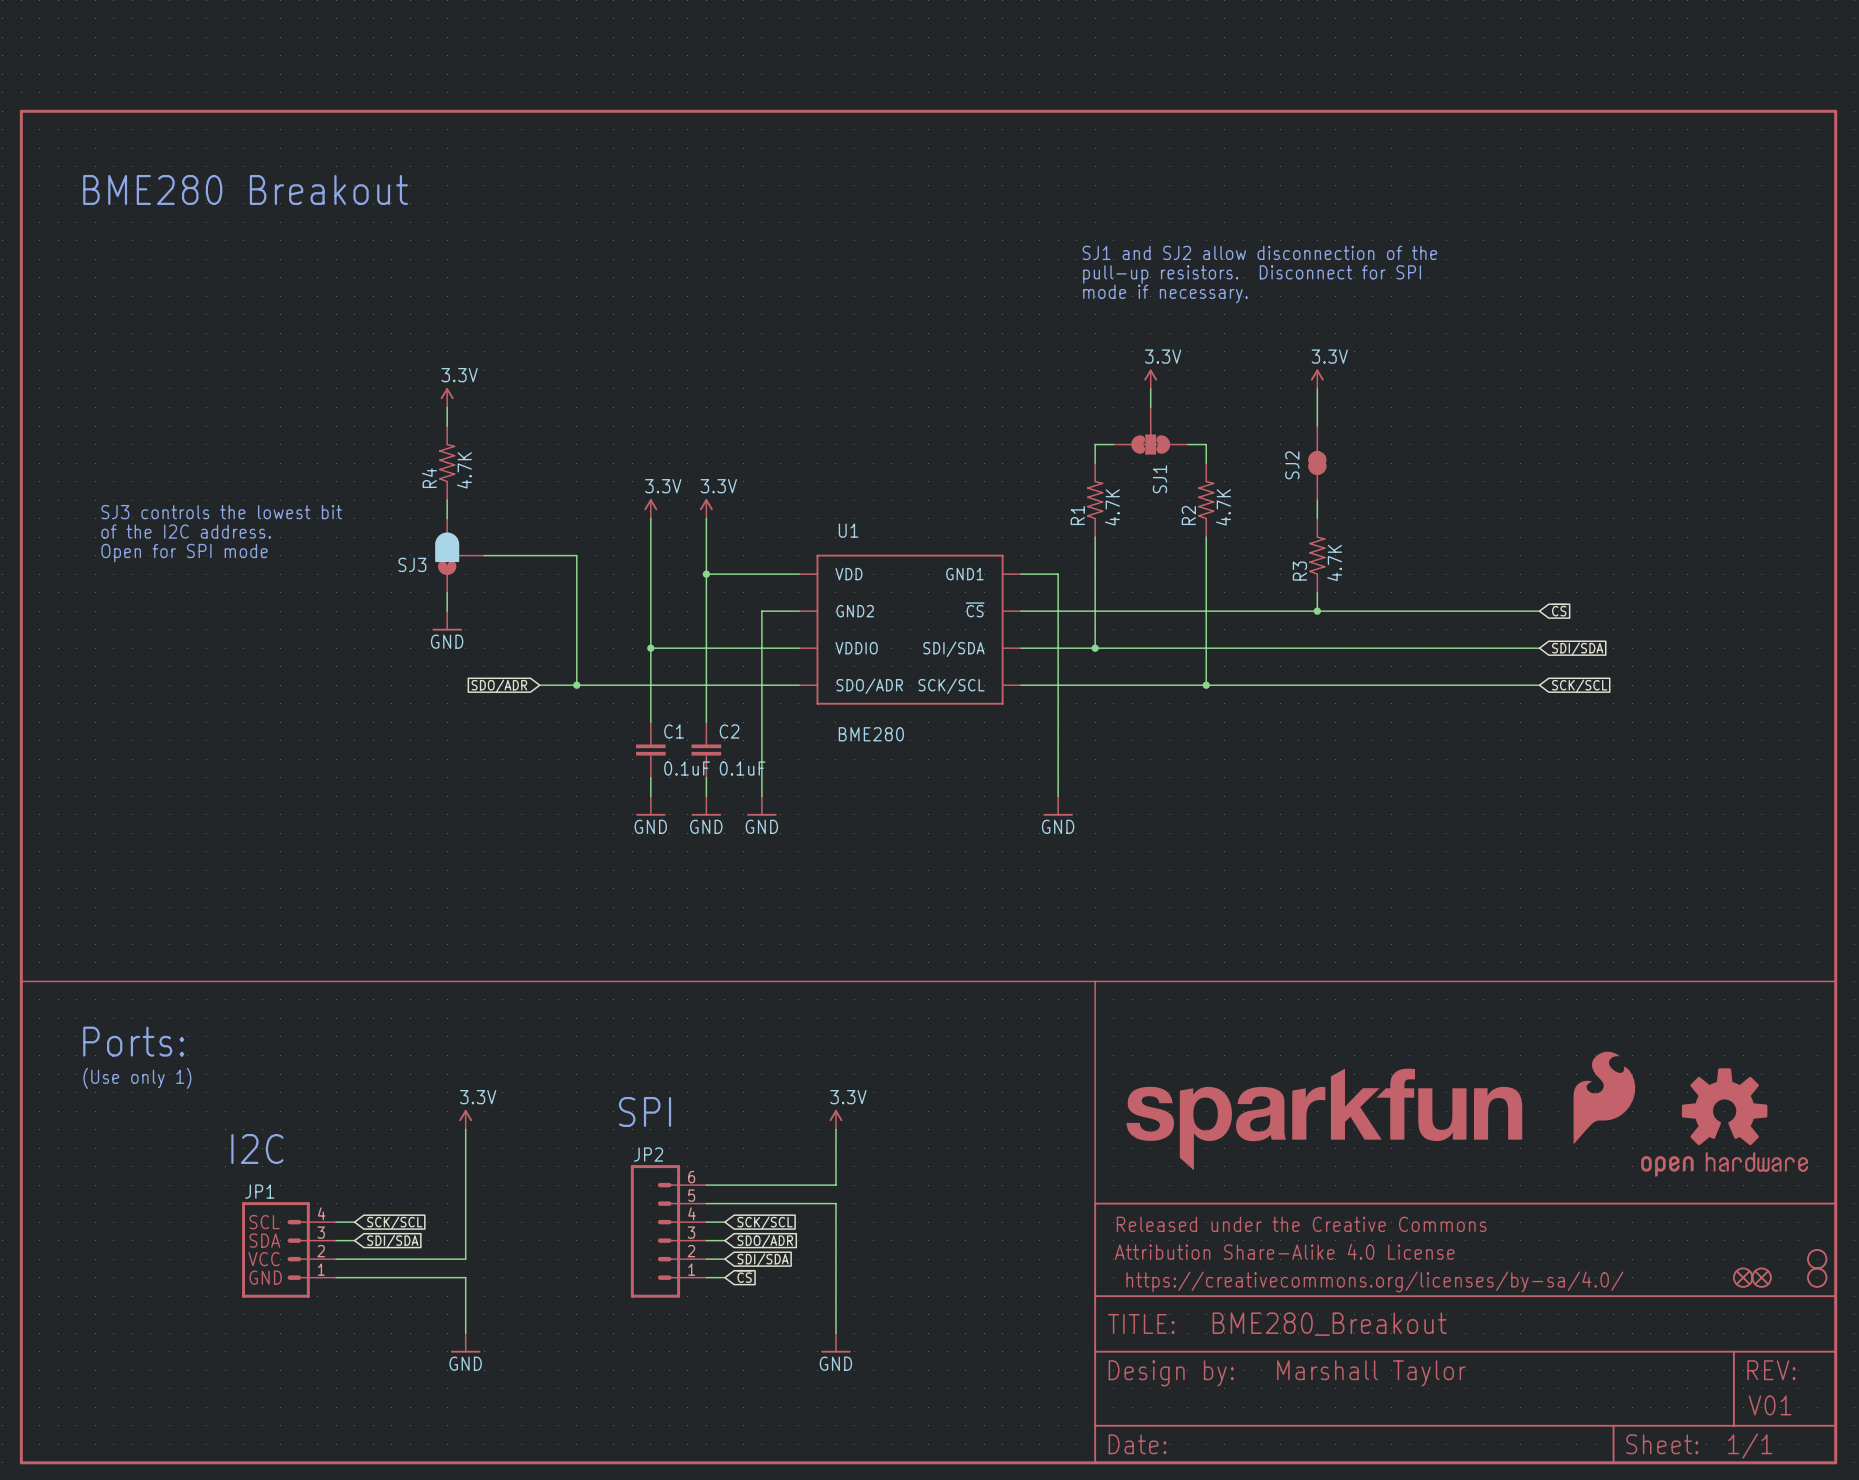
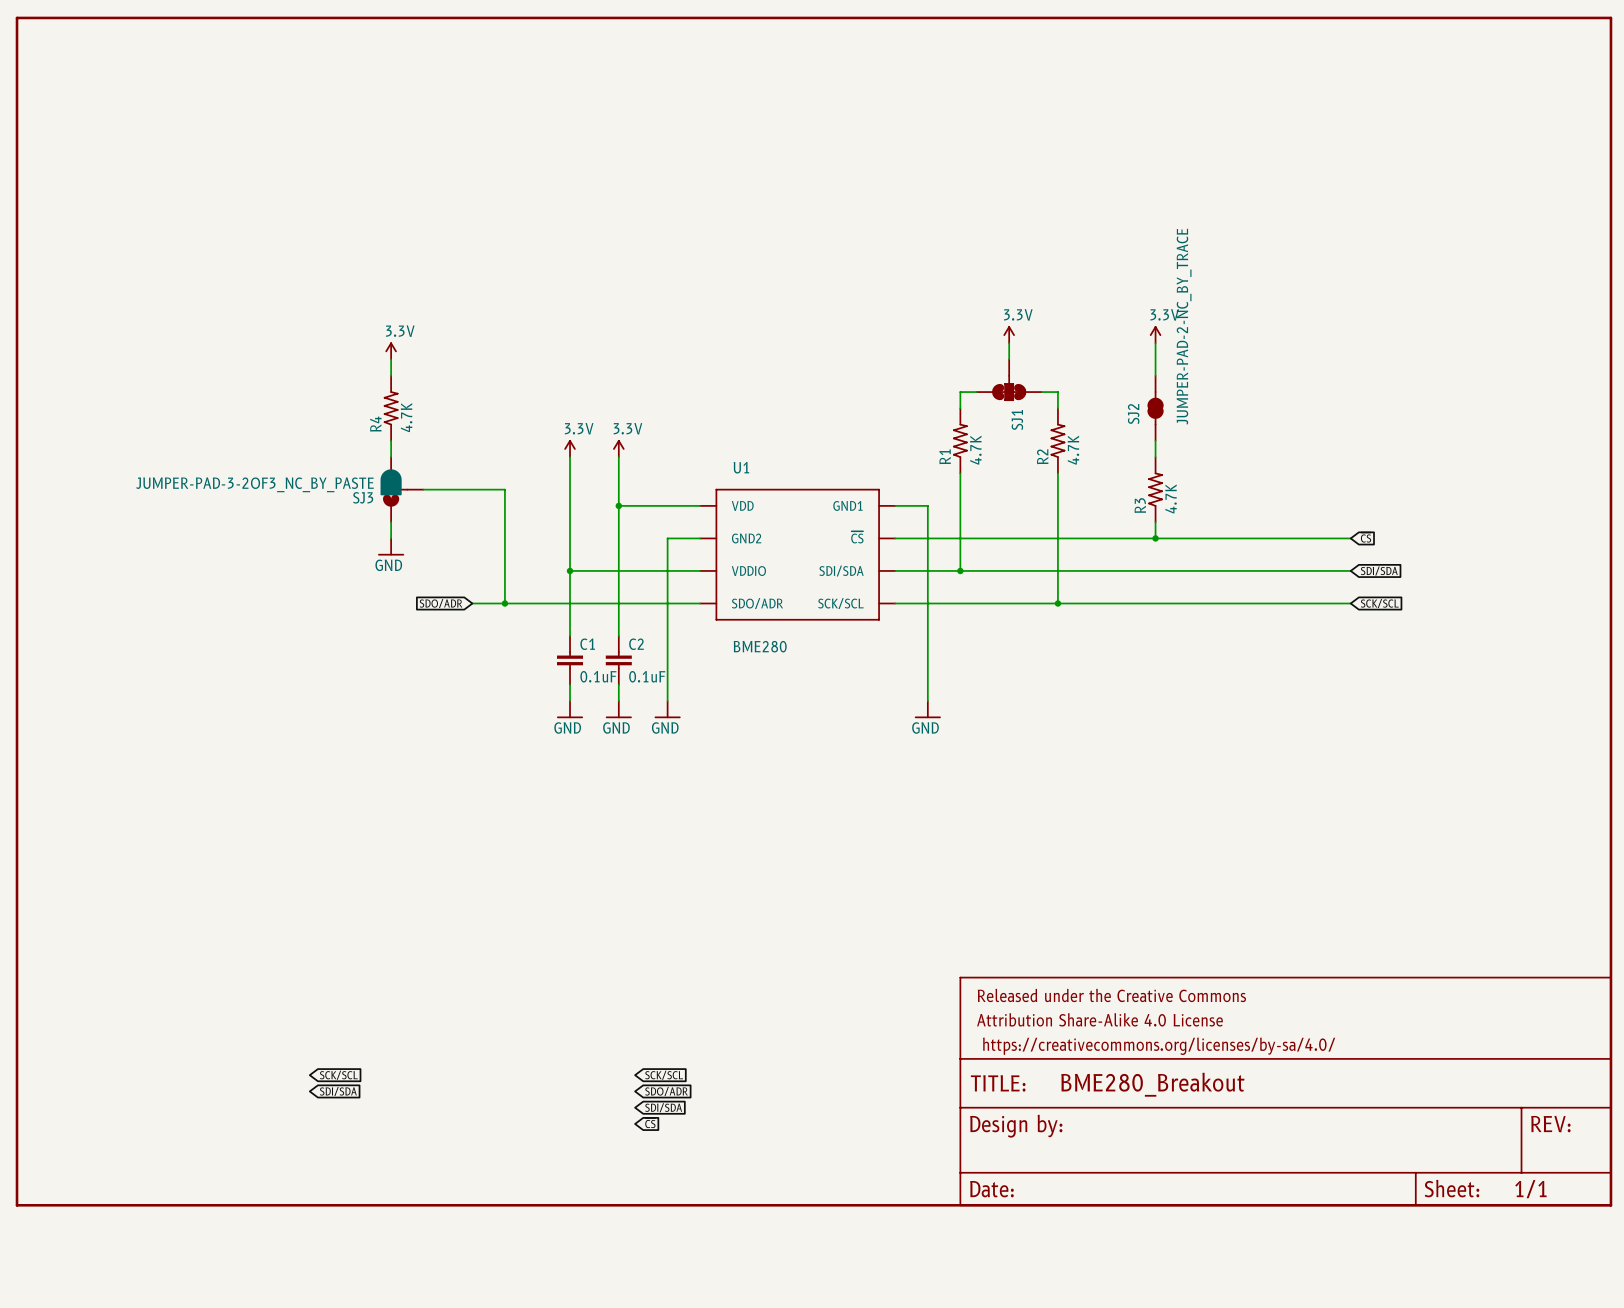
text: BME280 Breakout (245, 189) -> none
text: SJ1 and SJ2 allow disconnection of the (1259, 252) -> none
text: pull-up resistors. Disconnect for SPI (1252, 274) -> none
text: mode if necessary. (1165, 293) -> none
SJ2 value: none -> JUMPER-PAD-2-NC_BY_TRACE (1184, 326)
text: SJ3 controls the lowest bit (221, 512) -> none
text: of the I2C address. (186, 531) -> none
SJ3 value: none -> JUMPER-PAD-3-2OF3_NC_BY_PASTE (254, 484)
text: Open for SPI mode (184, 553) -> none
part position: (928, 787) -> (813, 611)
line: (21, 981) (1835, 981) -> none
line: (1095, 981) (1095, 1203) -> none
text: Ports: (133, 1041) -> none
text: (Use only 1) (137, 1078) -> none
part: (1604, 1098) -> none
text: SPI (645, 1111) -> none
power symbol: 3.3V (465, 1119) -> none
power symbol: 3.3V (835, 1119) -> none
part: (1324, 1119) -> none
part: (1724, 1122) -> none
wire: (465, 1129) (465, 1259) (336, 1259) -> none
wire: (835, 1129) (835, 1185) (706, 1185) -> none
text: I2C (257, 1148) -> none
wire: (706, 1203) (835, 1203) (835, 1333) -> none
wire: (336, 1222) (354, 1222) -> none
wire: (706, 1222) (724, 1222) -> none
JP2: (668, 1231) -> none
wire: (336, 1240) (354, 1240) -> none
wire: (706, 1240) (724, 1240) -> none
JP1: (289, 1249) -> none
wire: (706, 1259) (724, 1259) -> none
part: (1817, 1259) -> none
wire: (336, 1277) (465, 1277) (465, 1333) -> none
wire: (706, 1277) (724, 1277) -> none
part: (1743, 1277) -> none
part: (1761, 1277) -> none
part: (1817, 1277) -> none
part position: (1465, 1333) -> (1285, 1091)
power symbol: GND (465, 1342) -> none
power symbol: GND (835, 1342) -> none
text: Marshall Taylor (1371, 1373) -> none
text: V01 (1770, 1405) -> none

